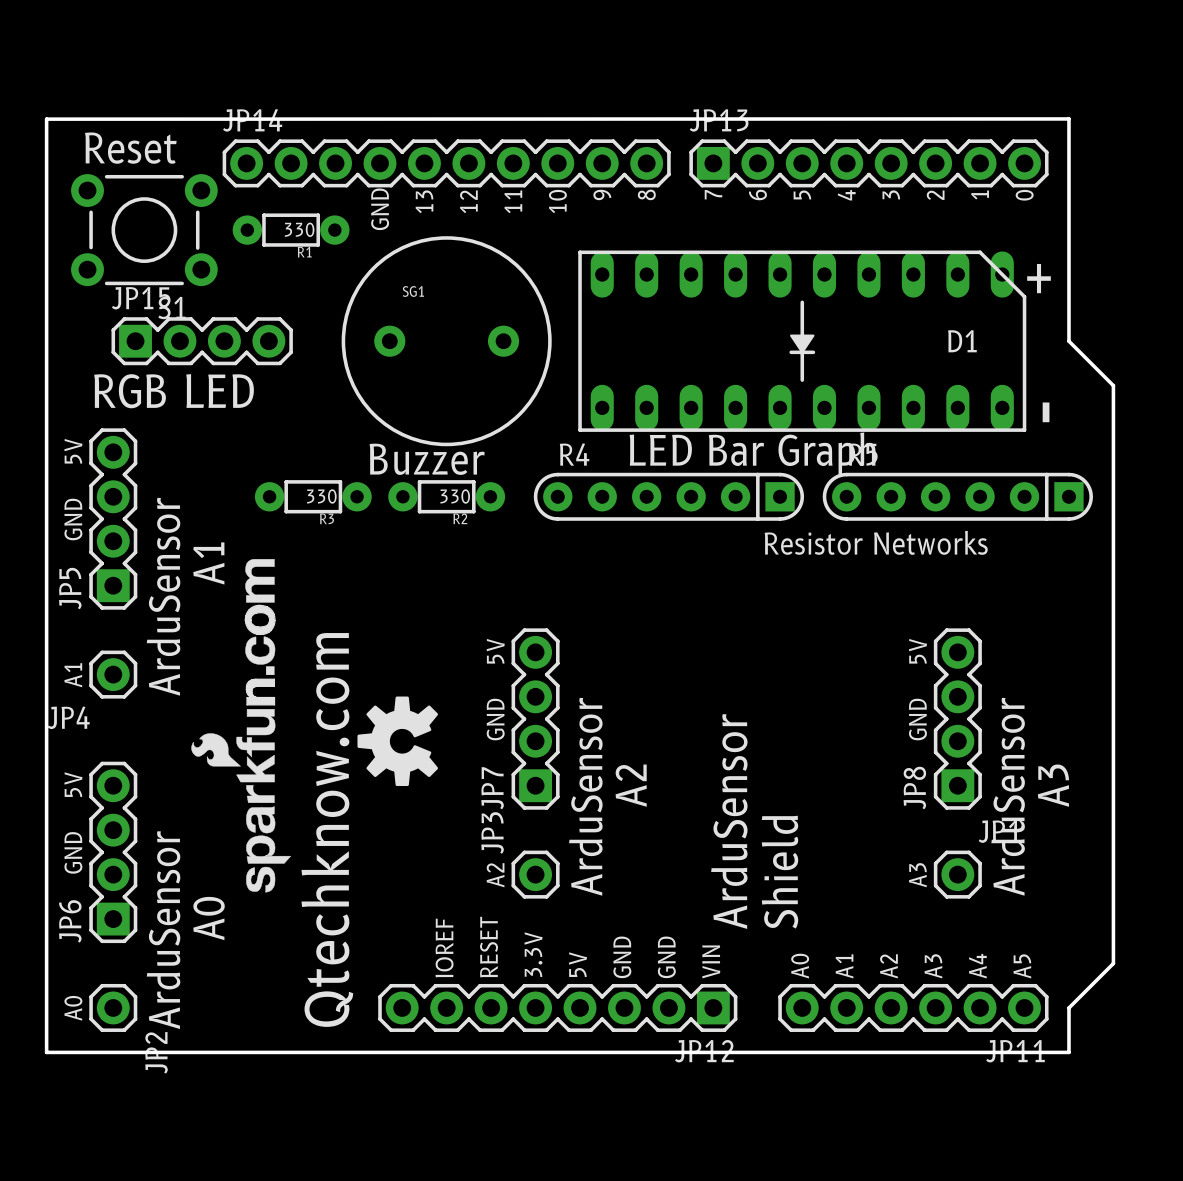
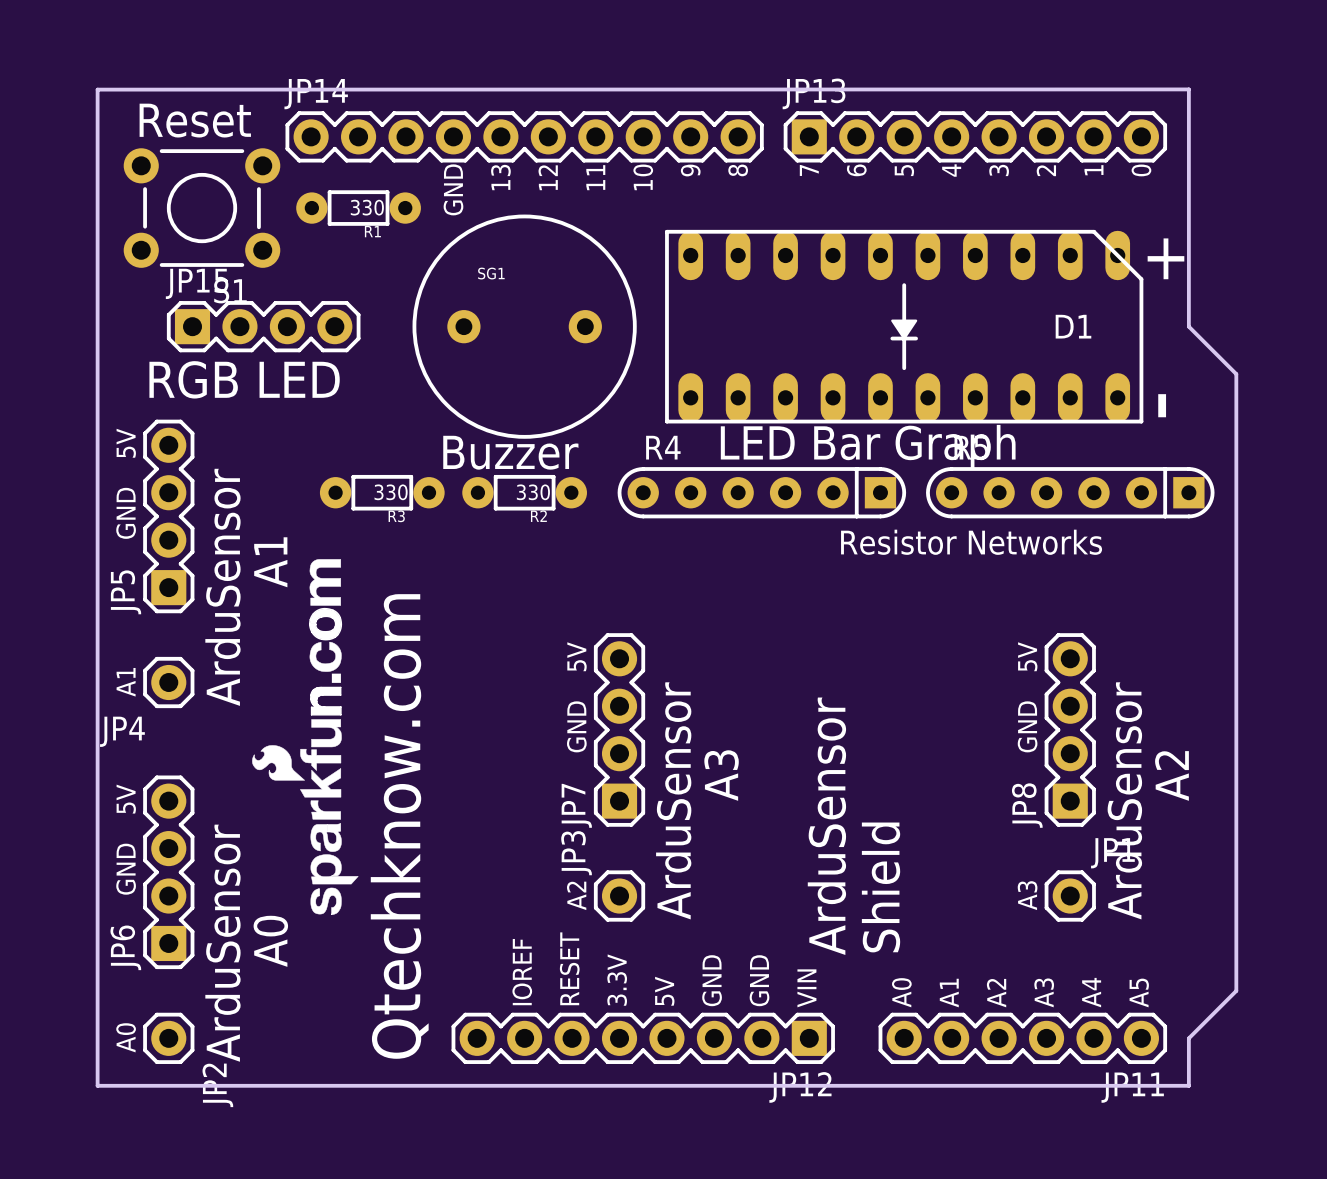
drawing: [357, 696, 439, 787] -> none
text position: A2 (631, 785) -> A2 (1171, 775)
text position: A3 (1053, 785) -> A3 (721, 775)

